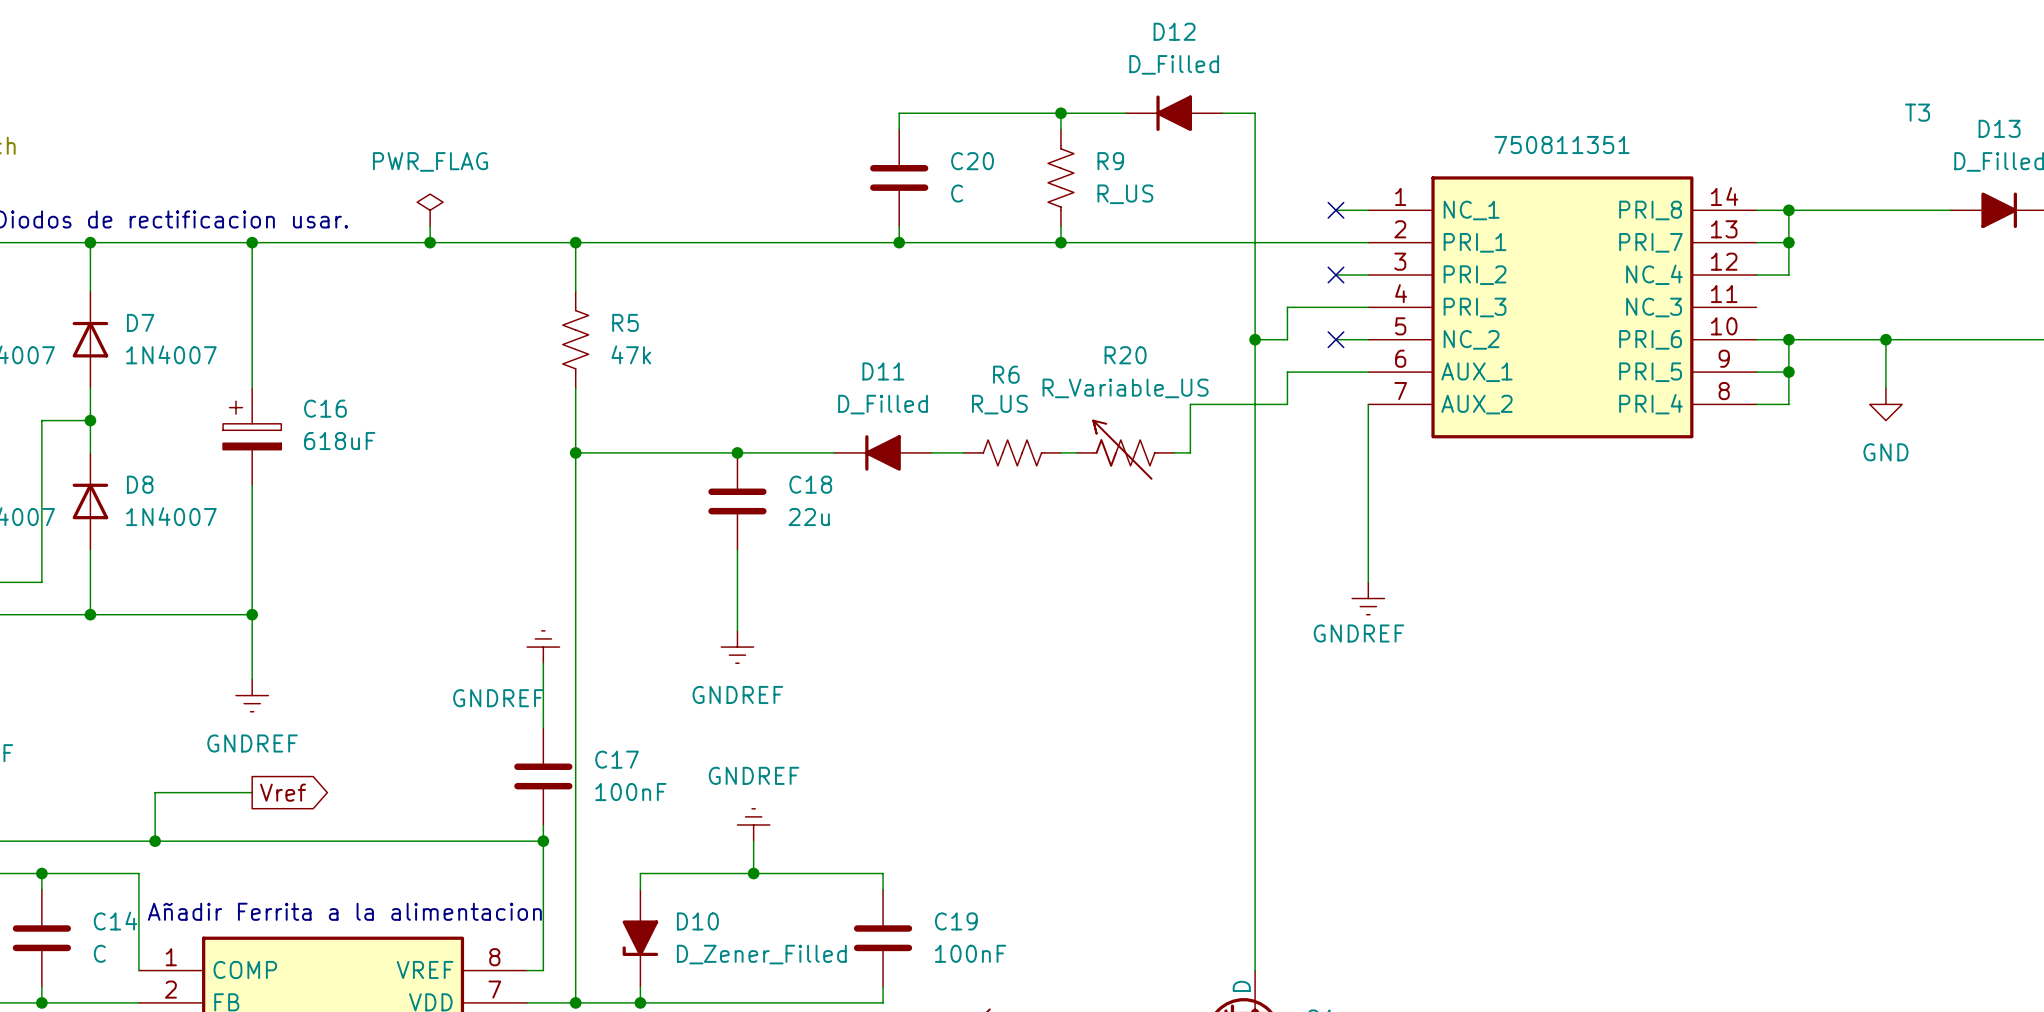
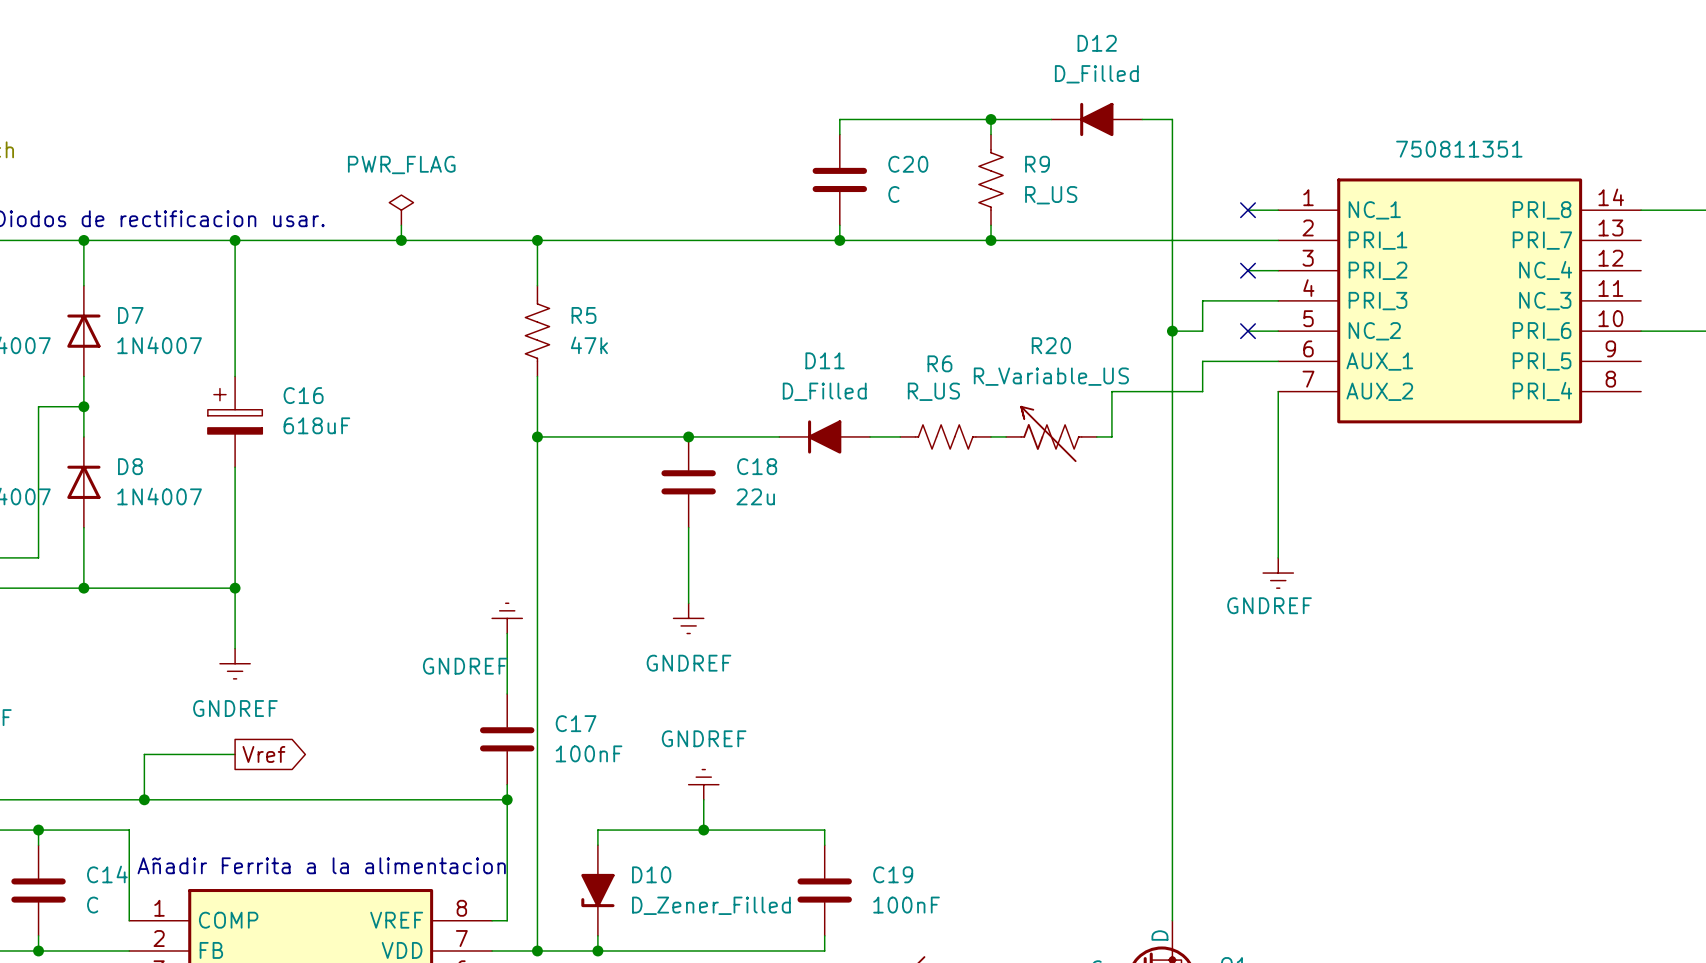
wire: (1788, 210) (1788, 275) (1756, 275) -> none
junction: (1788, 210) -> none
wire: (1756, 242) (1788, 242) -> none
junction: (1788, 242) -> none
wire: (1788, 339) (1788, 404) (1756, 404) -> none
junction: (1788, 339) -> none
wire: (1756, 372) (1788, 372) -> none
junction: (1788, 372) -> none

